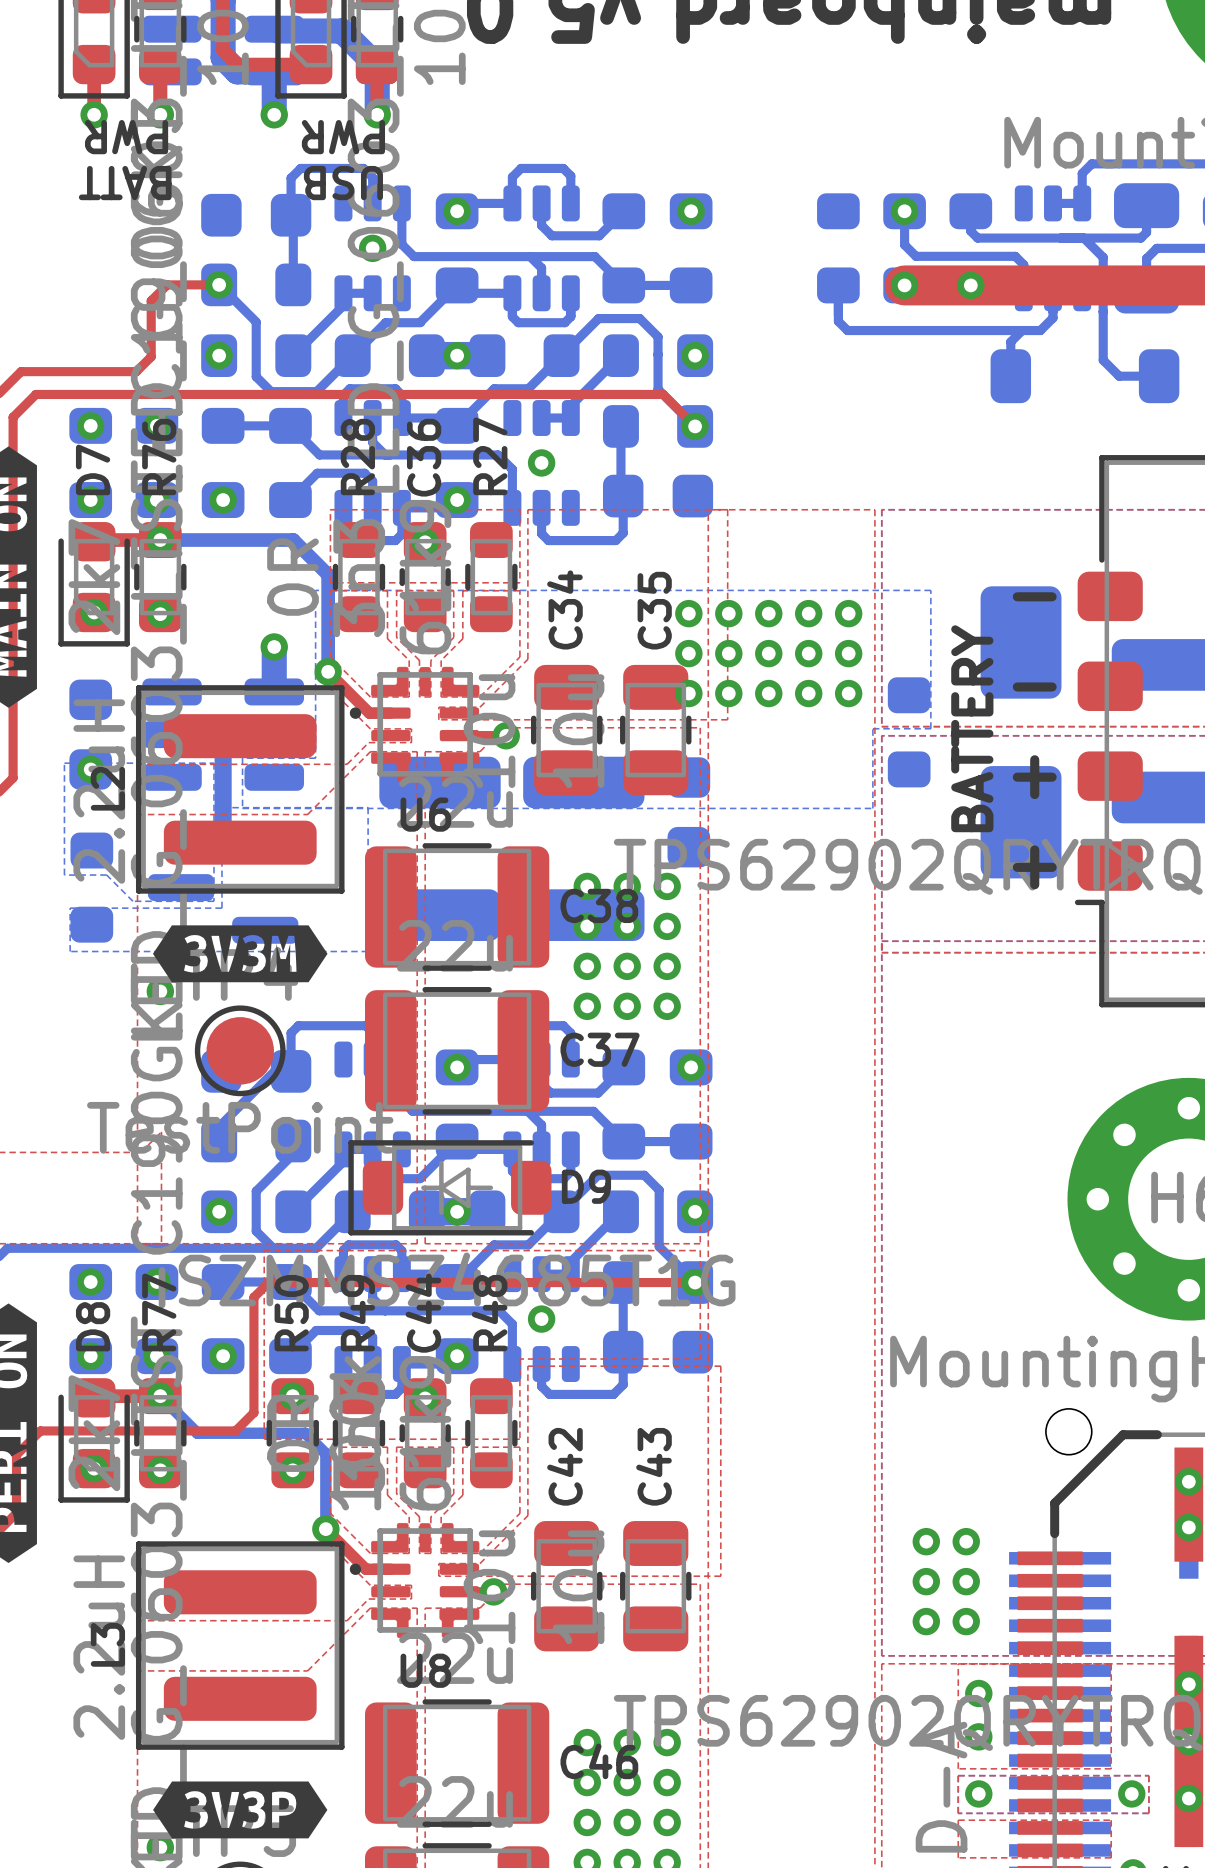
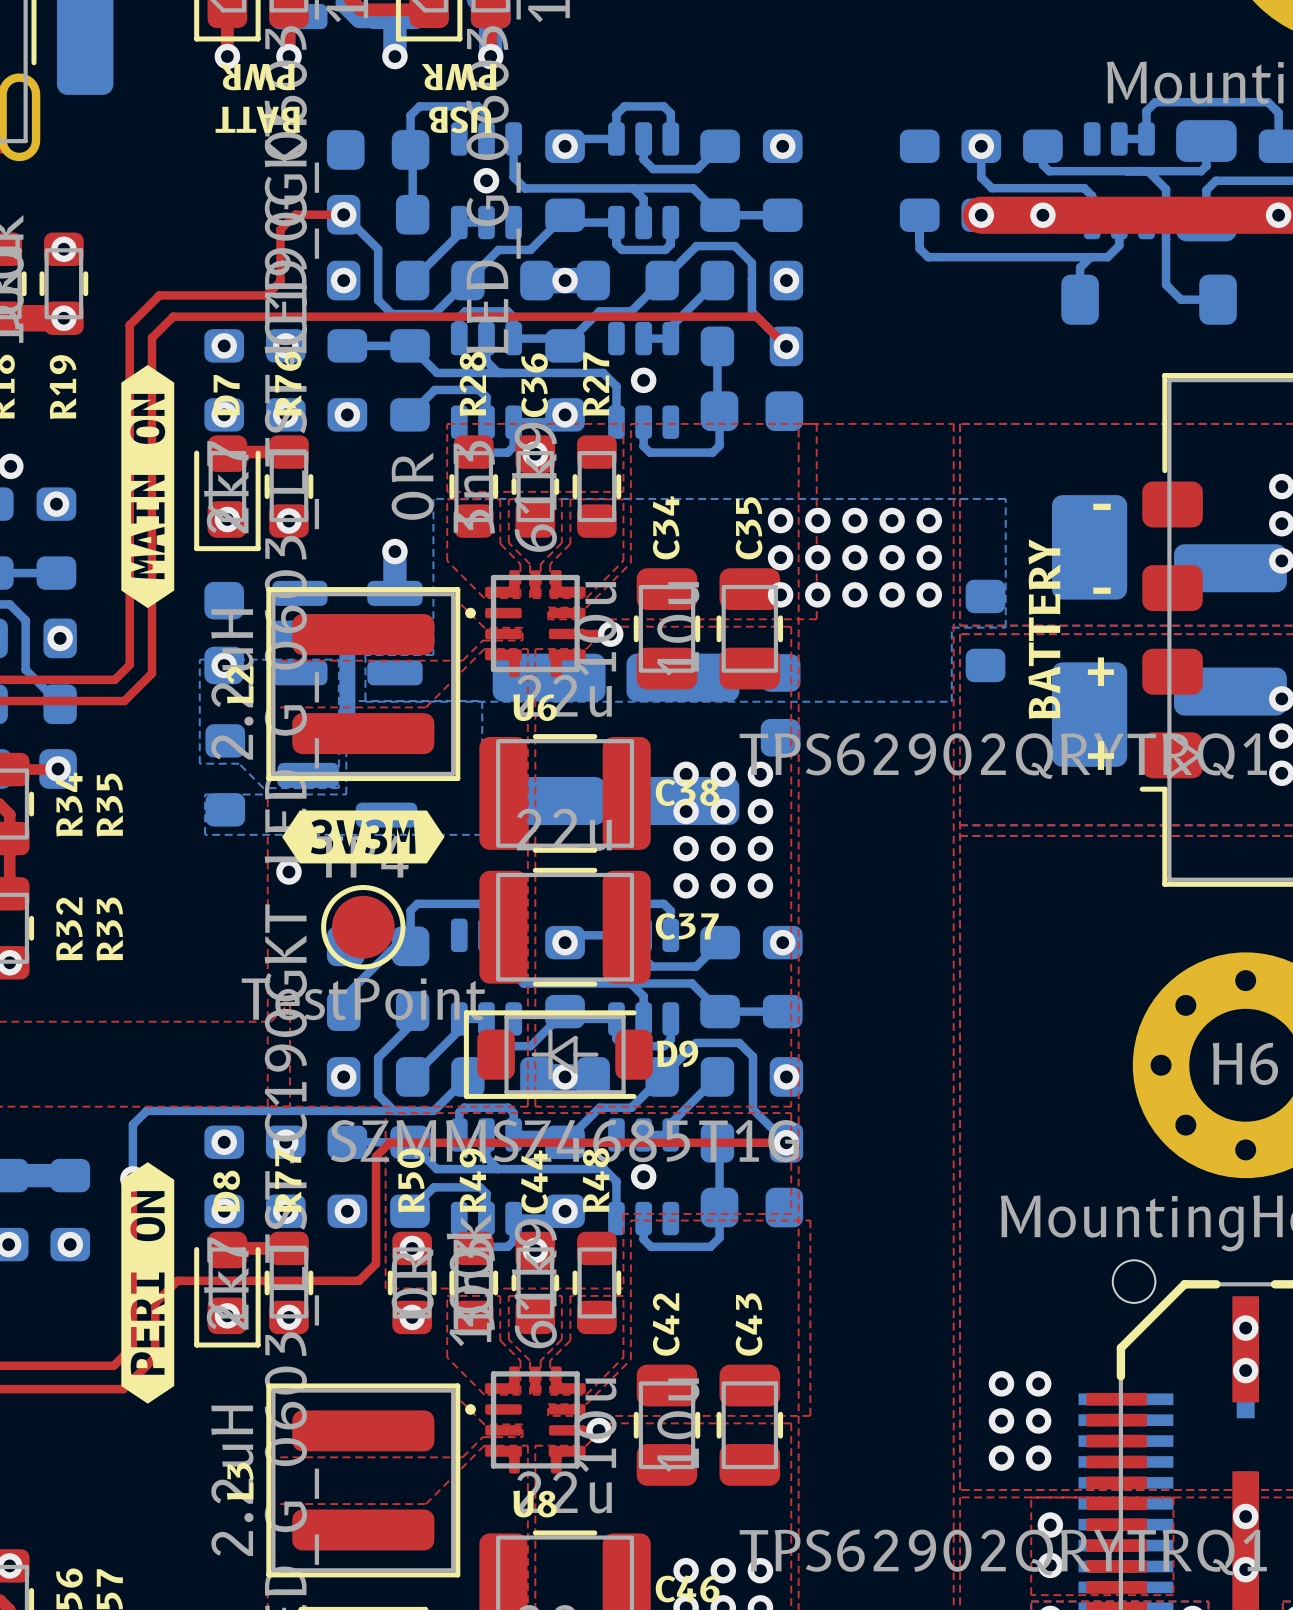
bottom track: (160, 540) (293, 540) (328, 574) (328, 671) -> none
via: (160, 540) -> none
top track: (328, 671) (369, 713) (390, 713) -> none
via: (328, 671) -> none
bottom track: (160, 1396) (197, 1433) (305, 1433) (325, 1453) (325, 1529) -> none
via: (160, 1396) -> none
top track: (325, 1529) (365, 1569) (390, 1569) -> none
via: (325, 1529) -> none

